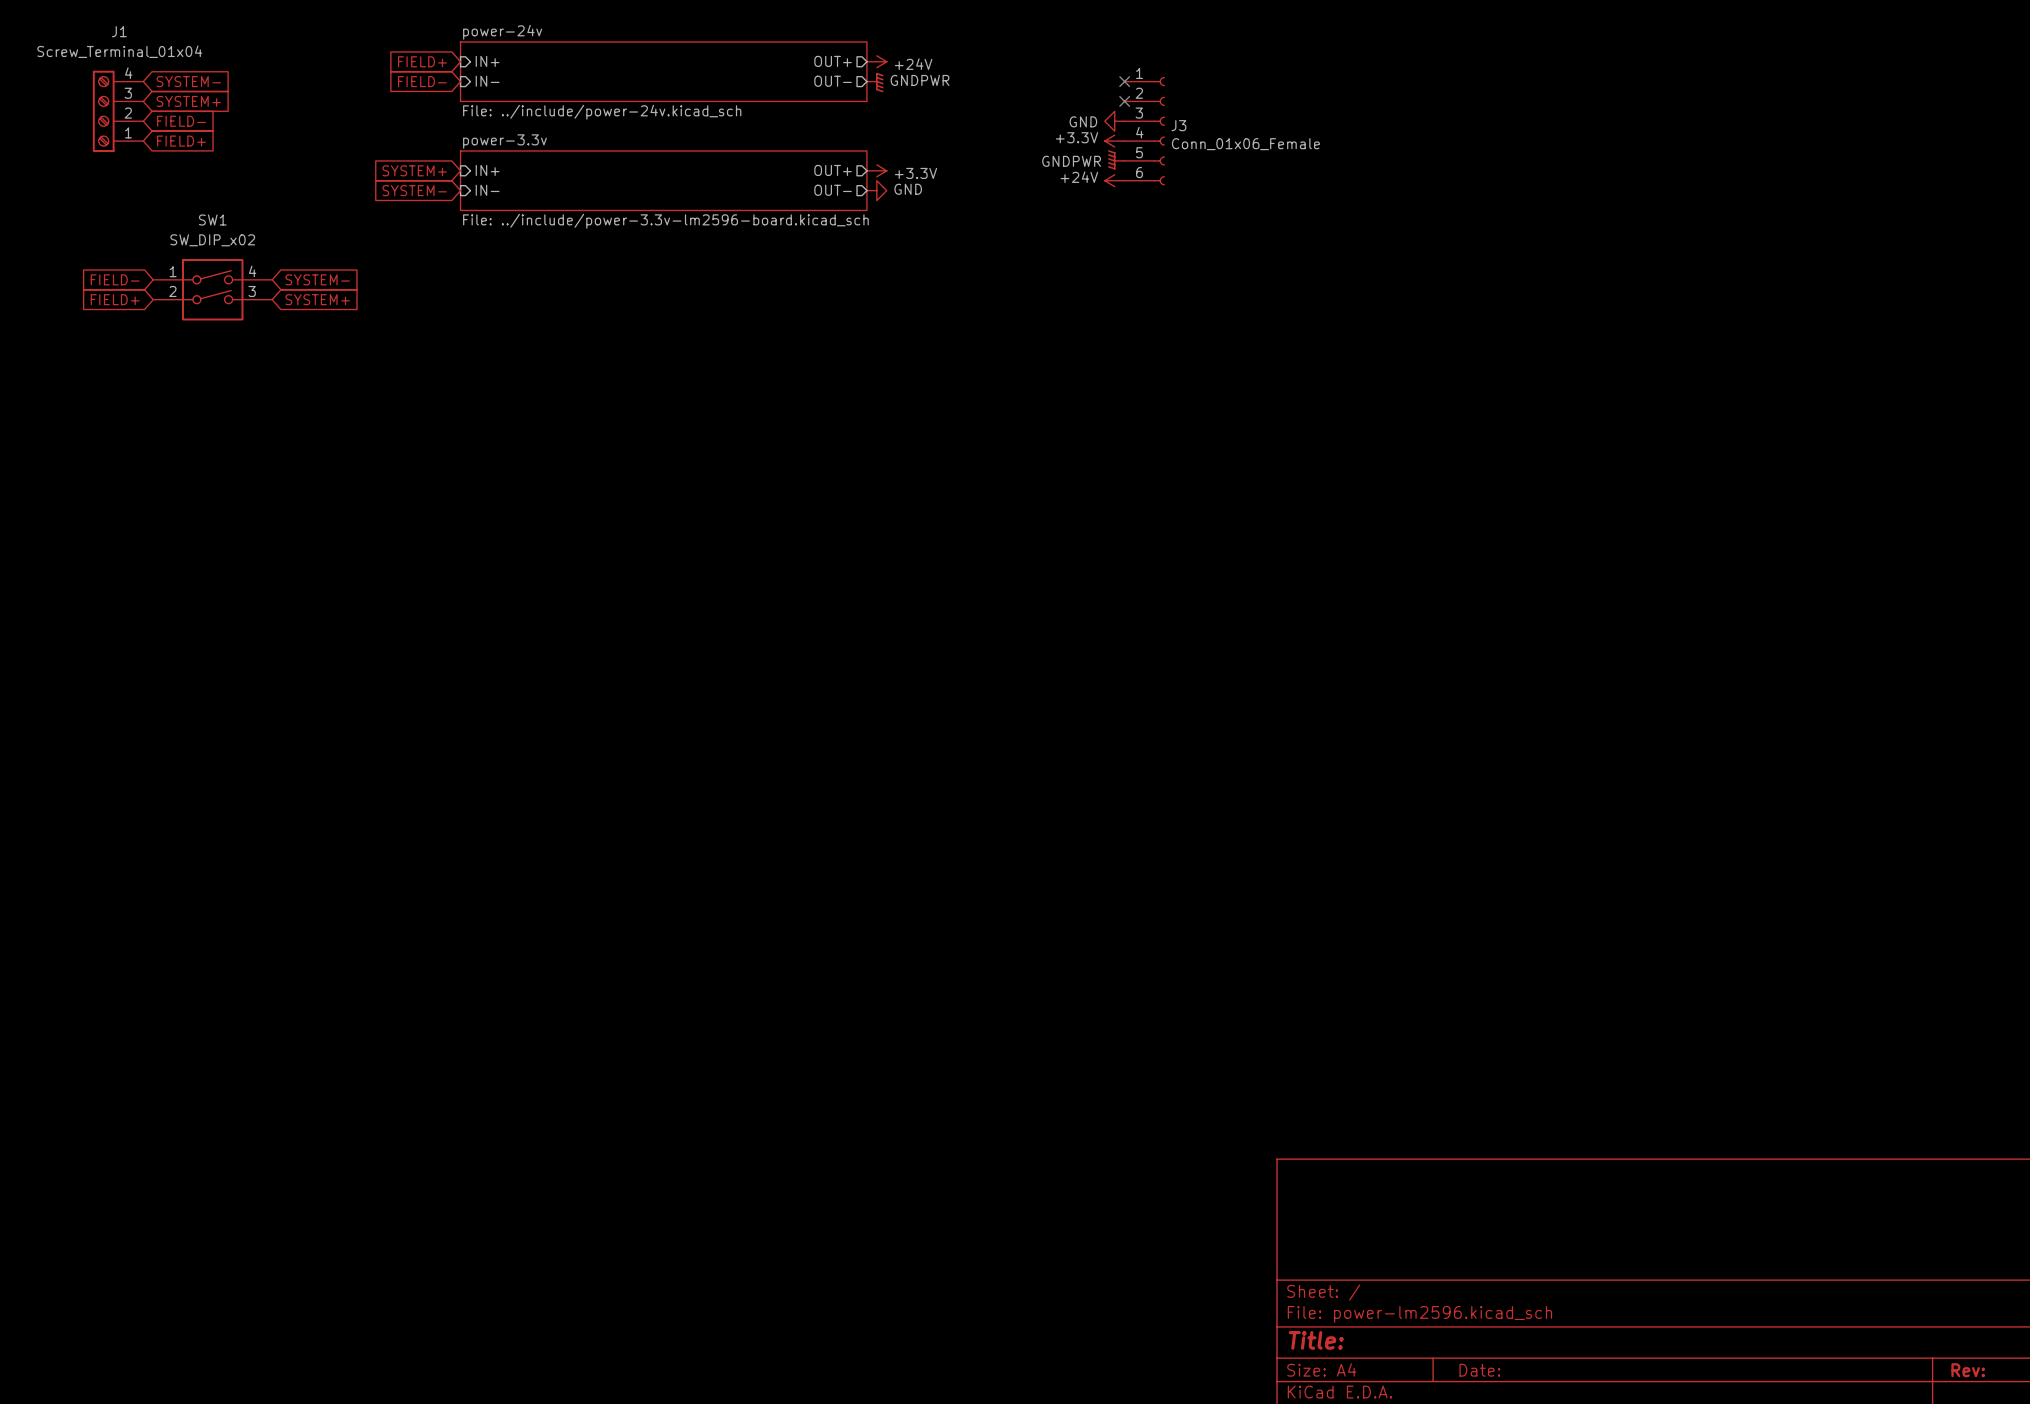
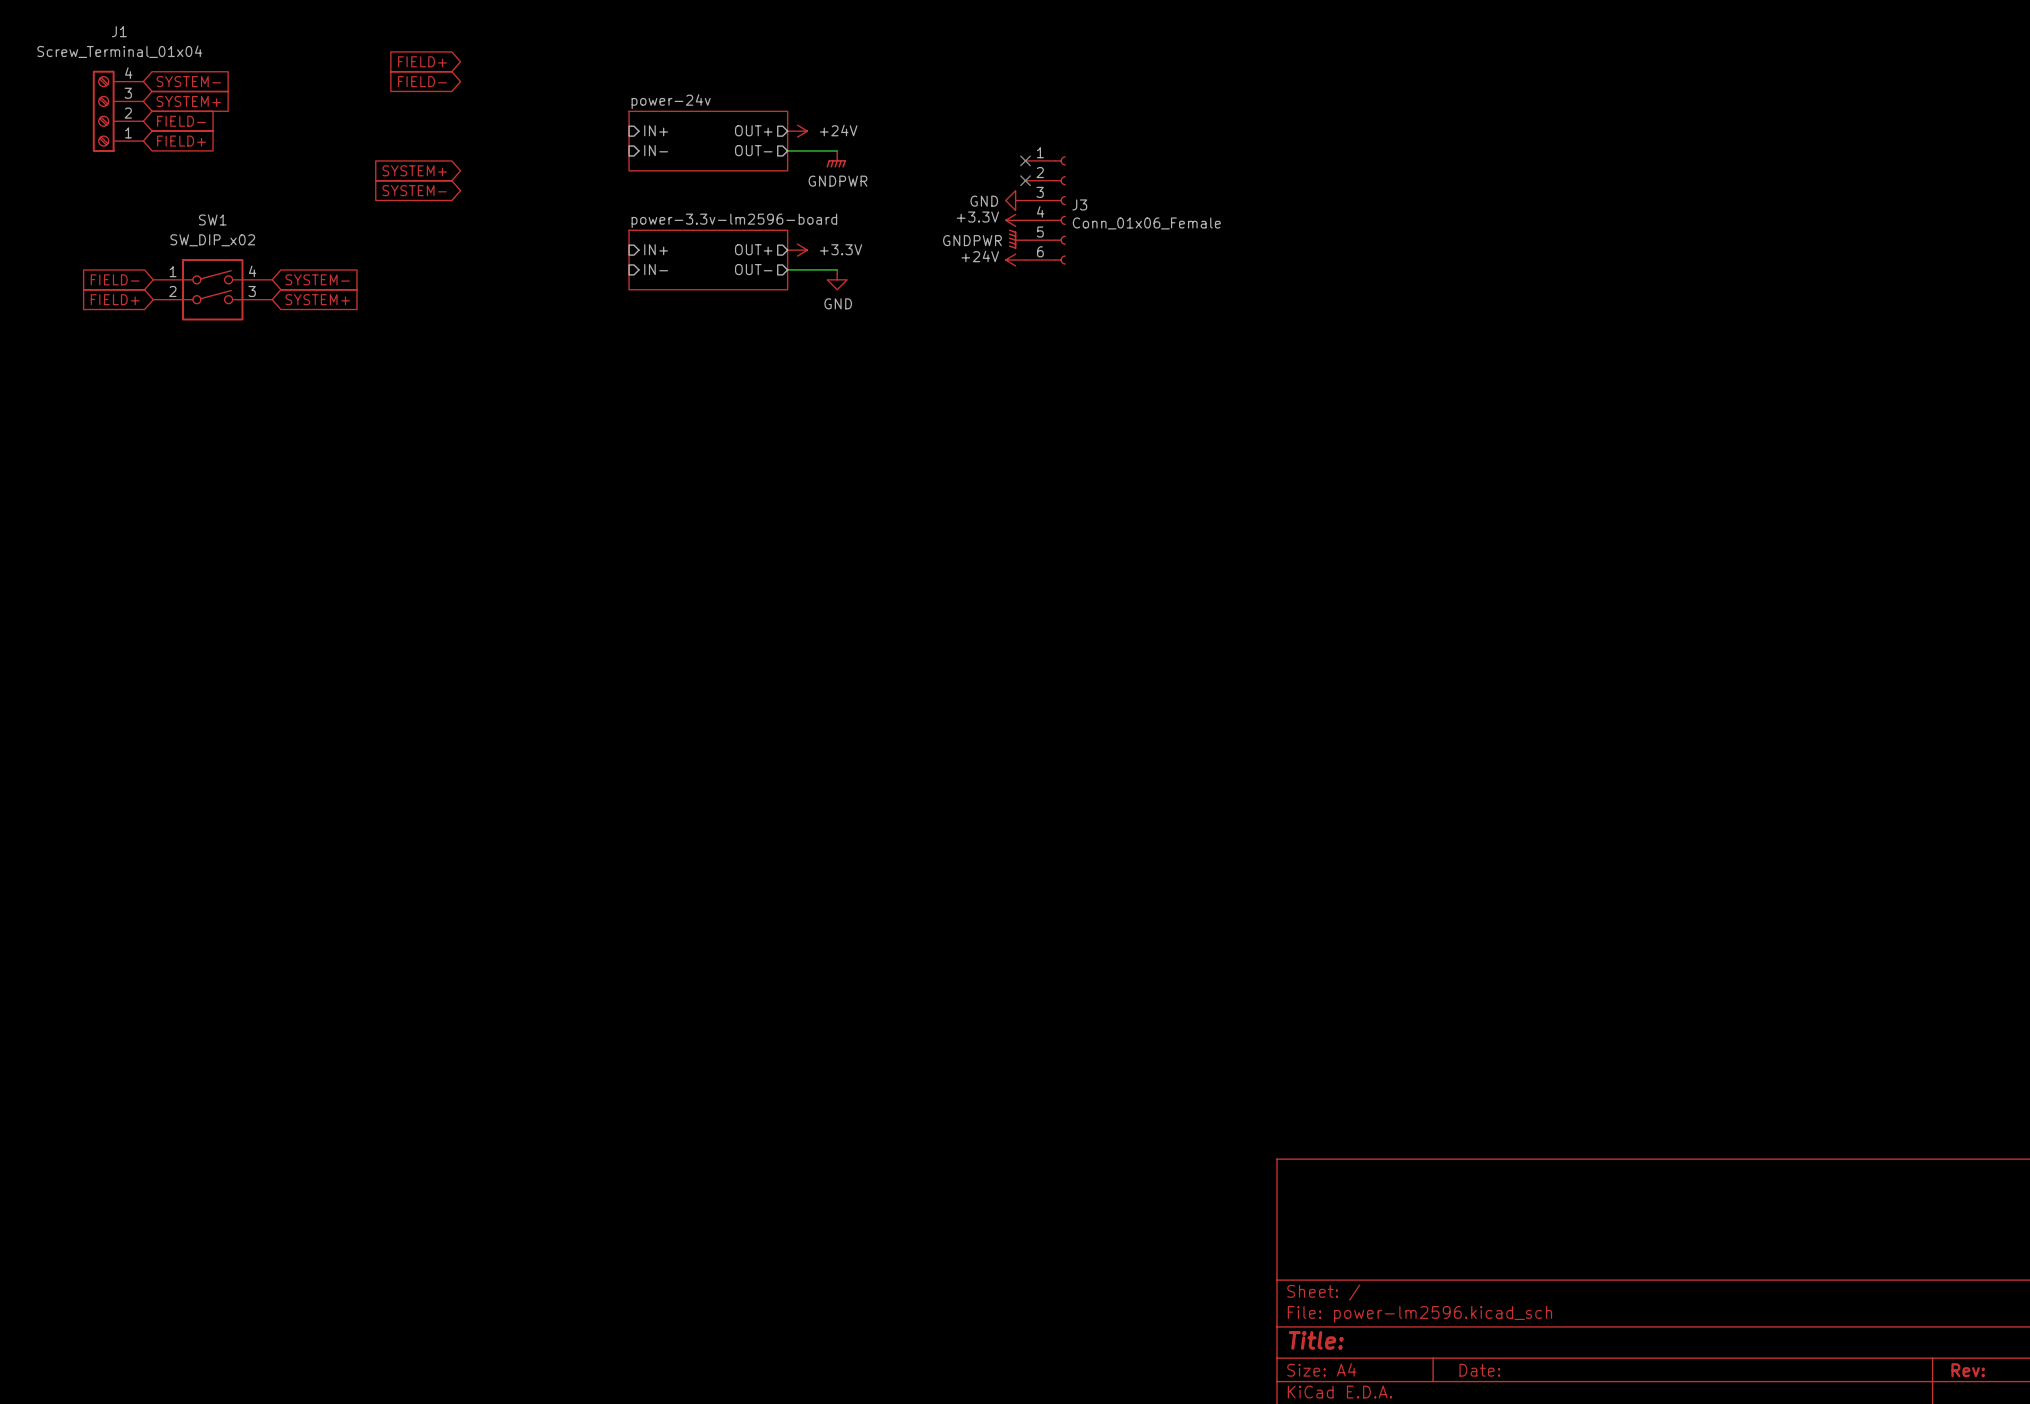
sheet power-24v name position: power-24v (502, 32) -> power-24v (671, 101)
sheet power-24v shape: [460, 41, 867, 102] -> [629, 111, 788, 171]
sheet pin: IN+ (487, 61) -> none
sheet pin: OUT+ (833, 61) -> none
power symbol position: +24V (876, 61) -> +24V (797, 131)
power symbol text position: +24V (913, 64) -> +24V (838, 130)
power symbol text position: GNDPWR (920, 80) -> GNDPWR (837, 181)
sheet pin: IN- (487, 81) -> none
sheet pin: OUT- (833, 81) -> none
no-connect mark: (1124, 81) -> none
power symbol rotation: 0° (875, 82) -> 90° clockwise (836, 159)
power symbol position: GNDPWR (875, 82) -> GNDPWR (836, 159)
no-connect mark: (1124, 101) -> none
sheet power-24v value: File: ../include/power-24v.kicad_sch (602, 112) -> none
power symbol: GND (1114, 121) -> none
sheet pin: none -> IN+ (656, 130)
sheet pin: none -> OUT+ (753, 130)
J3 position: (1144, 131) -> (1045, 210)
power symbol: +3.3V (1114, 141) -> none
sheet pin: none -> IN- (656, 150)
sheet pin: none -> OUT- (753, 150)
power symbol: GNDPWR (1116, 159) -> none
no-connect mark: none -> (1025, 160)
sheet pin: IN+ (487, 170) -> none
sheet pin: OUT+ (833, 170) -> none
power symbol: +3.3V (876, 170) -> none
sheet power-3.3v: File: ../include/power-3.3v-lm2596-board.kicad_sch (663, 180) -> none
no-connect mark: none -> (1025, 180)
power symbol: +24V (1114, 180) -> none
sheet pin: IN- (487, 190) -> none
sheet pin: OUT- (833, 190) -> none
power symbol: GND (876, 190) -> none
power symbol: none -> GND (1015, 200)
power symbol: none -> +3.3V (1015, 220)
power symbol: none -> GNDPWR (1017, 239)
sheet pin: none -> IN+ (656, 249)
sheet pin: none -> OUT+ (753, 249)
power symbol: none -> +3.3V (797, 250)
sheet power-3.3v-lm2596-board: none -> (708, 260)
power symbol: none -> +24V (1015, 260)
sheet pin: none -> IN- (656, 269)
sheet pin: none -> OUT- (753, 269)
wire: none -> (787, 269) (837, 269)
power symbol: none -> GND (837, 279)

